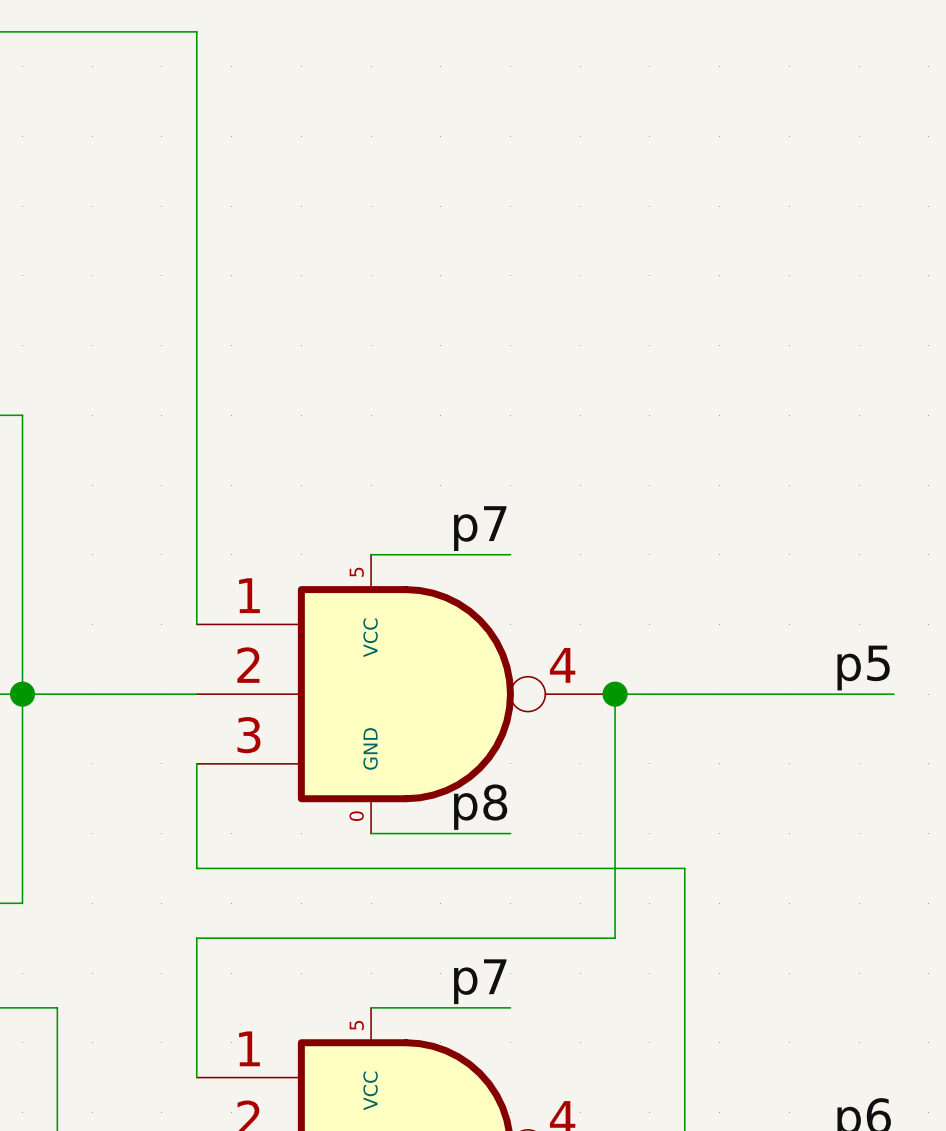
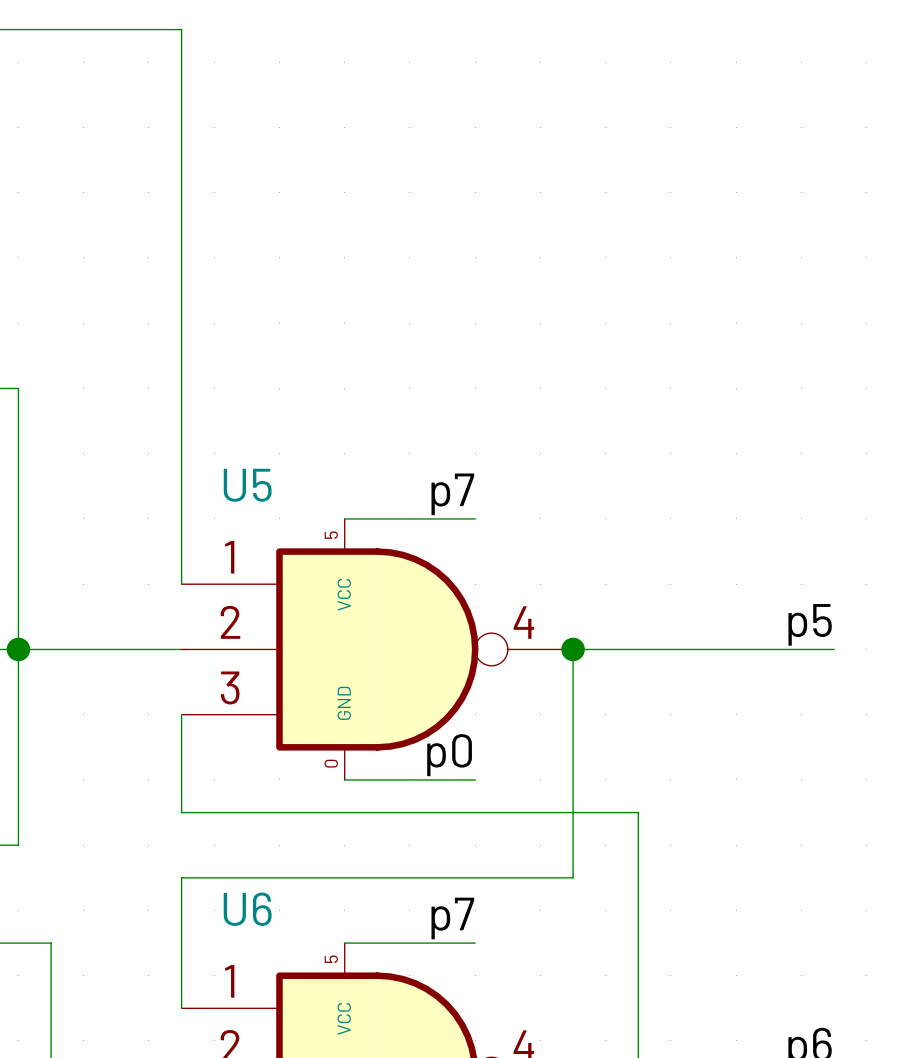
U5 name: none -> U5 (247, 485)
label: p8 (480, 807) -> p0 (449, 755)
U6 name: none -> U6 (247, 909)

